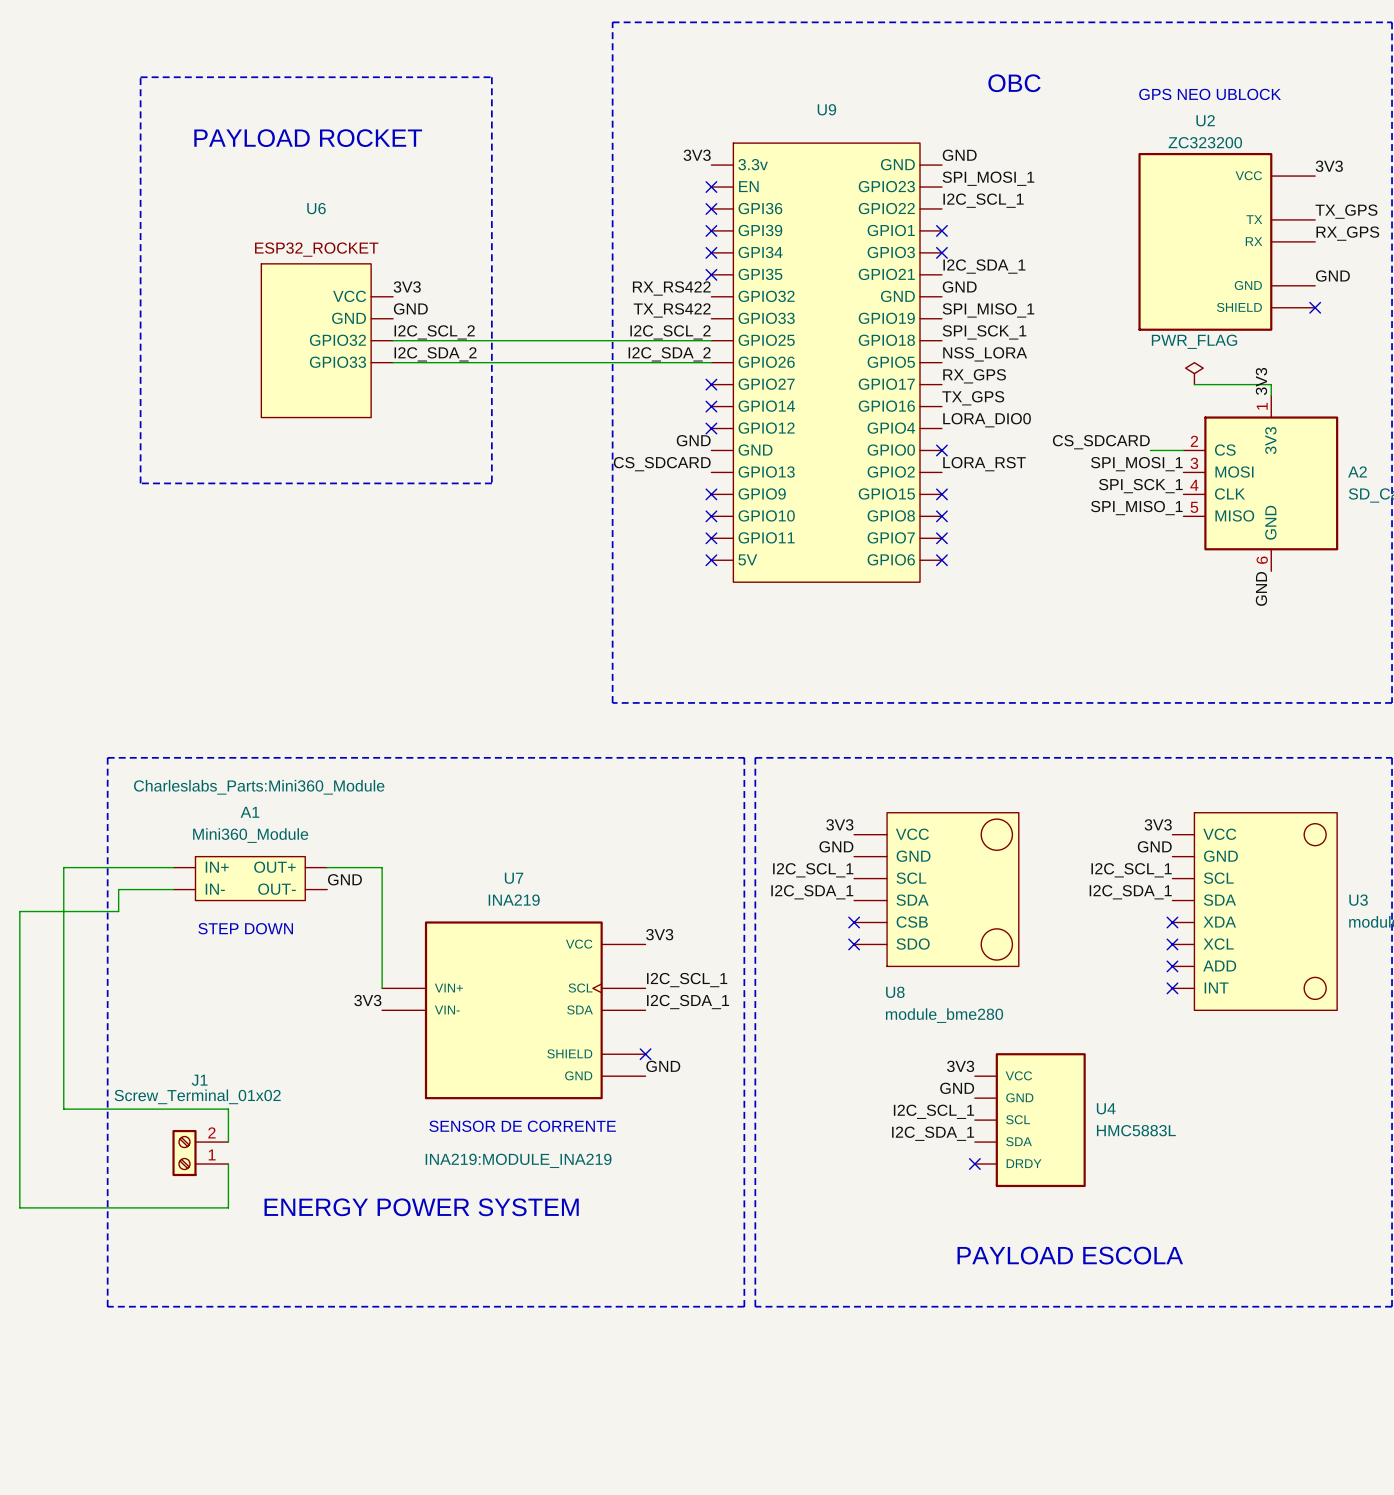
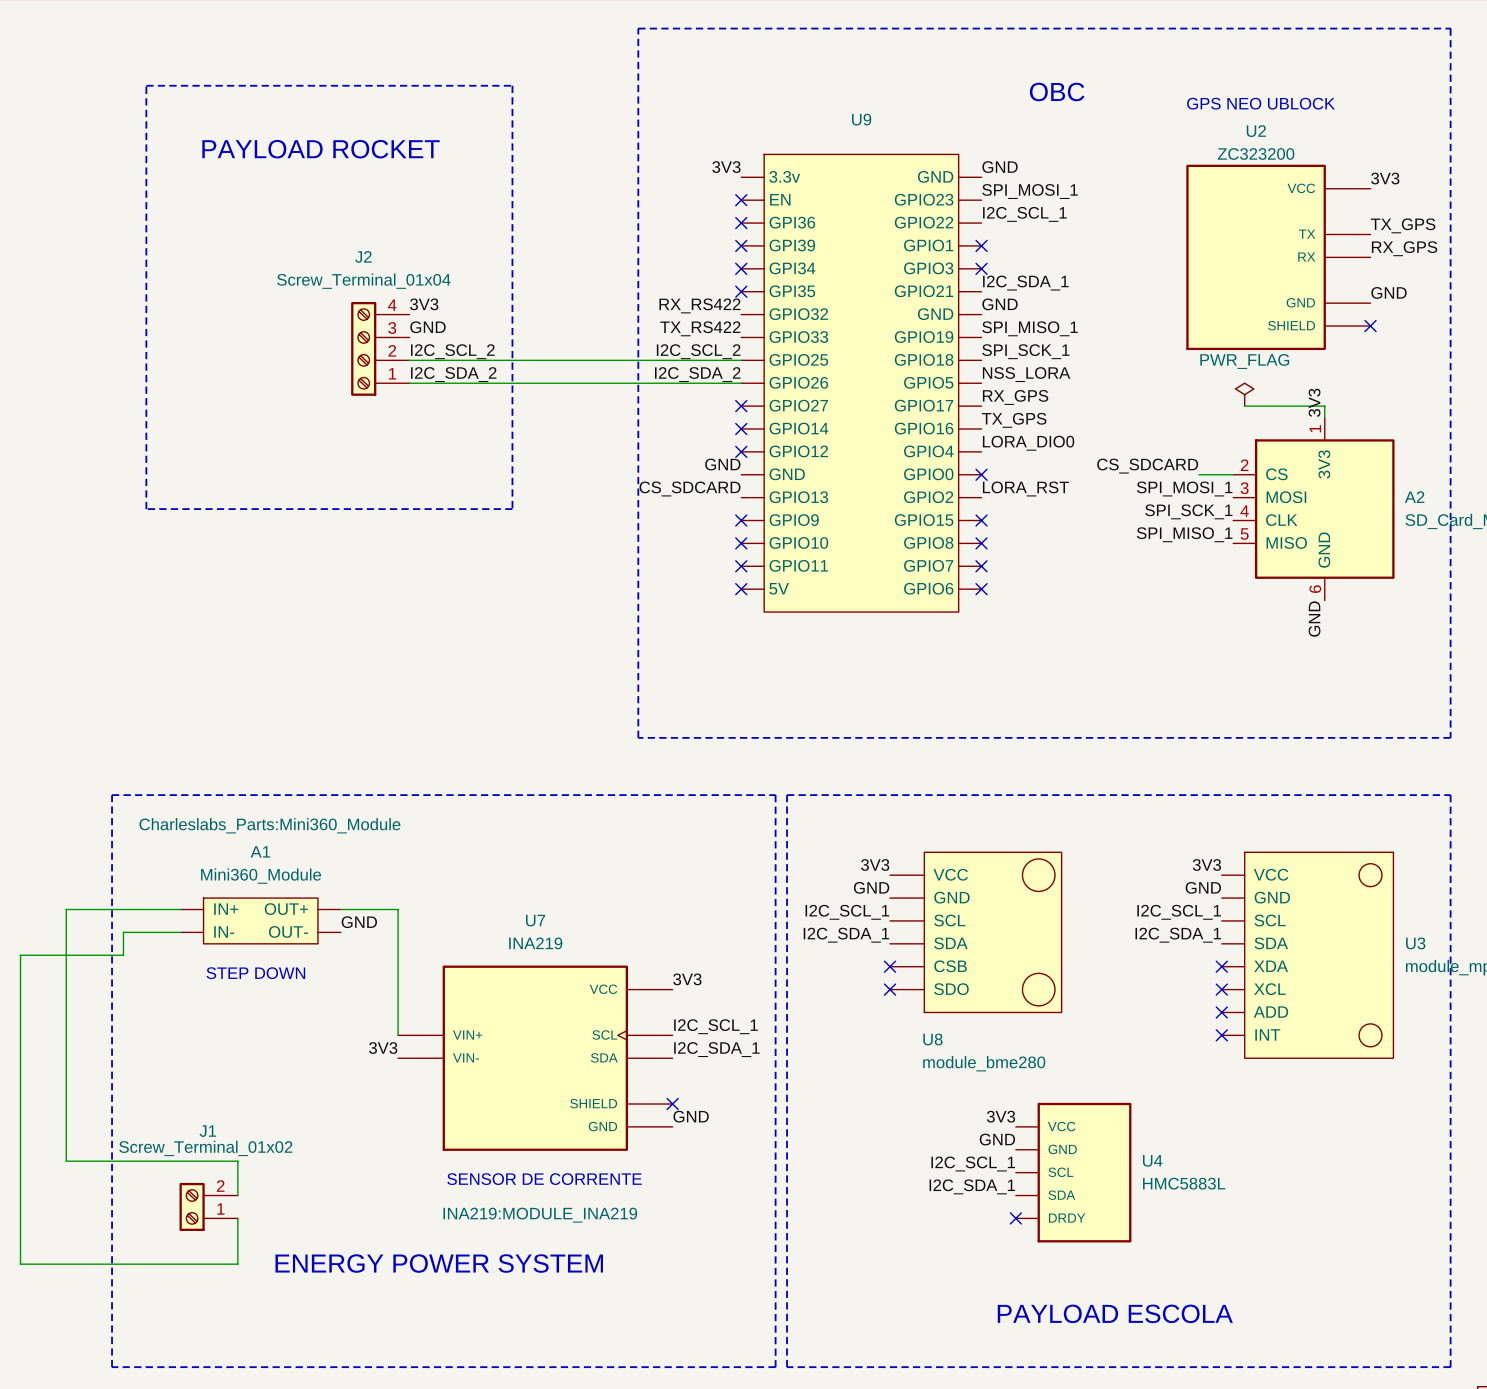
J2: none -> Screw_Terminal_01x04 (380, 348)
U6: (327, 340) -> none

